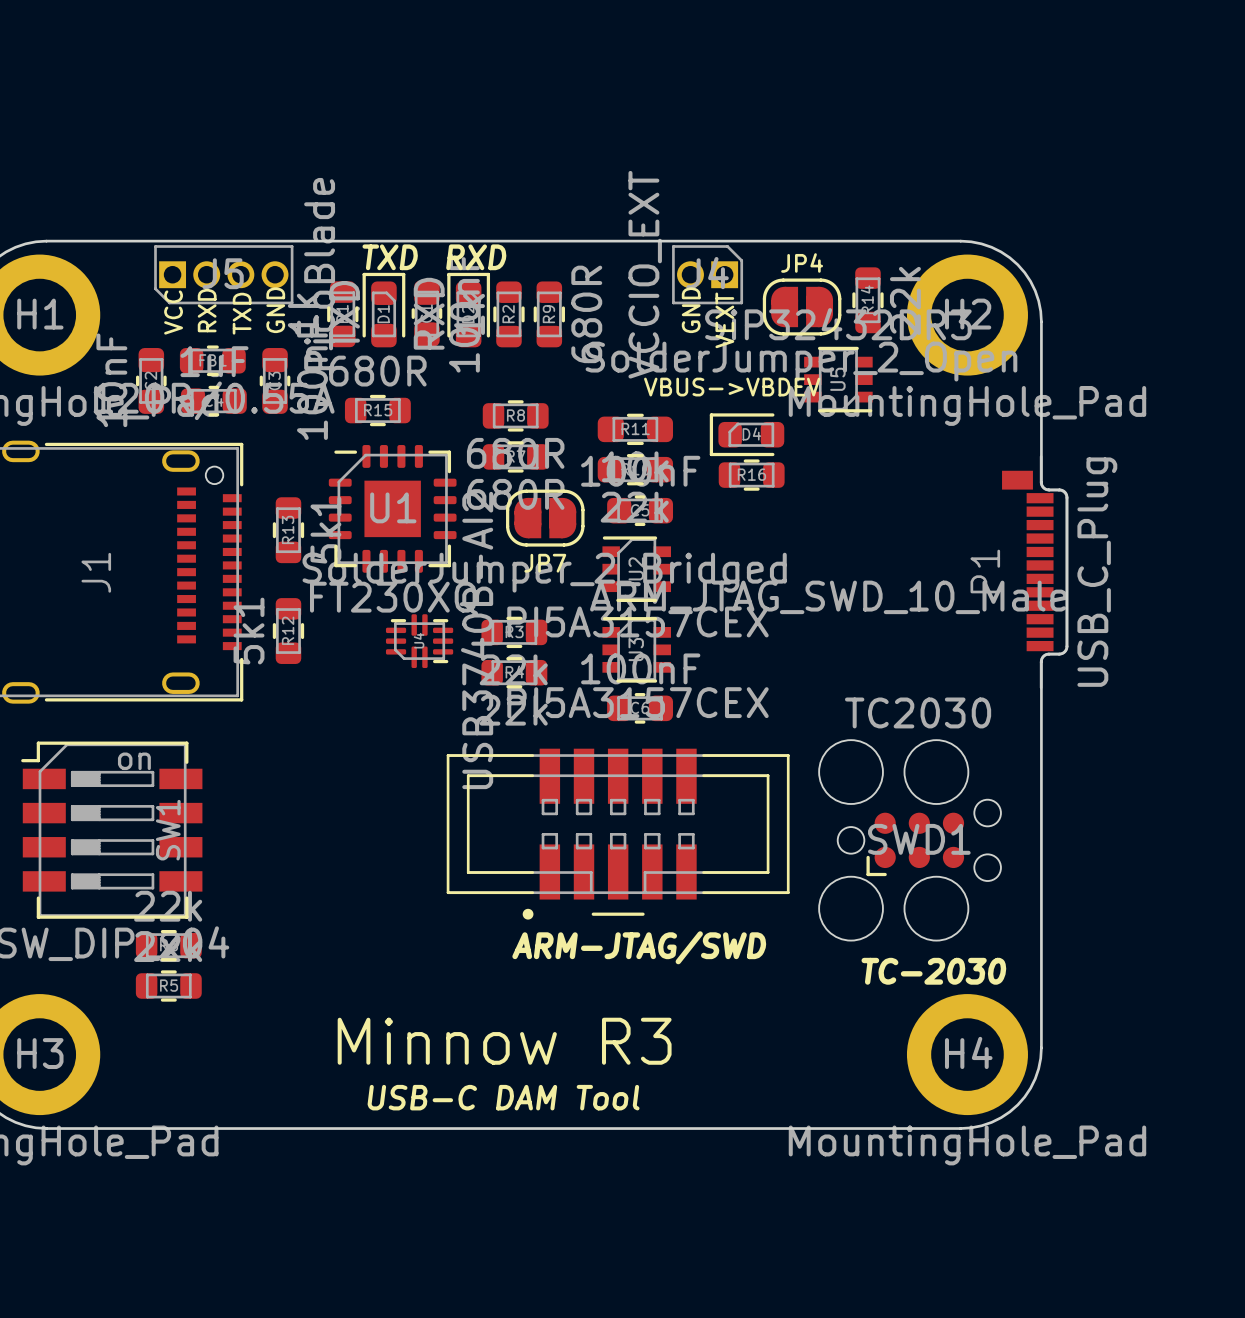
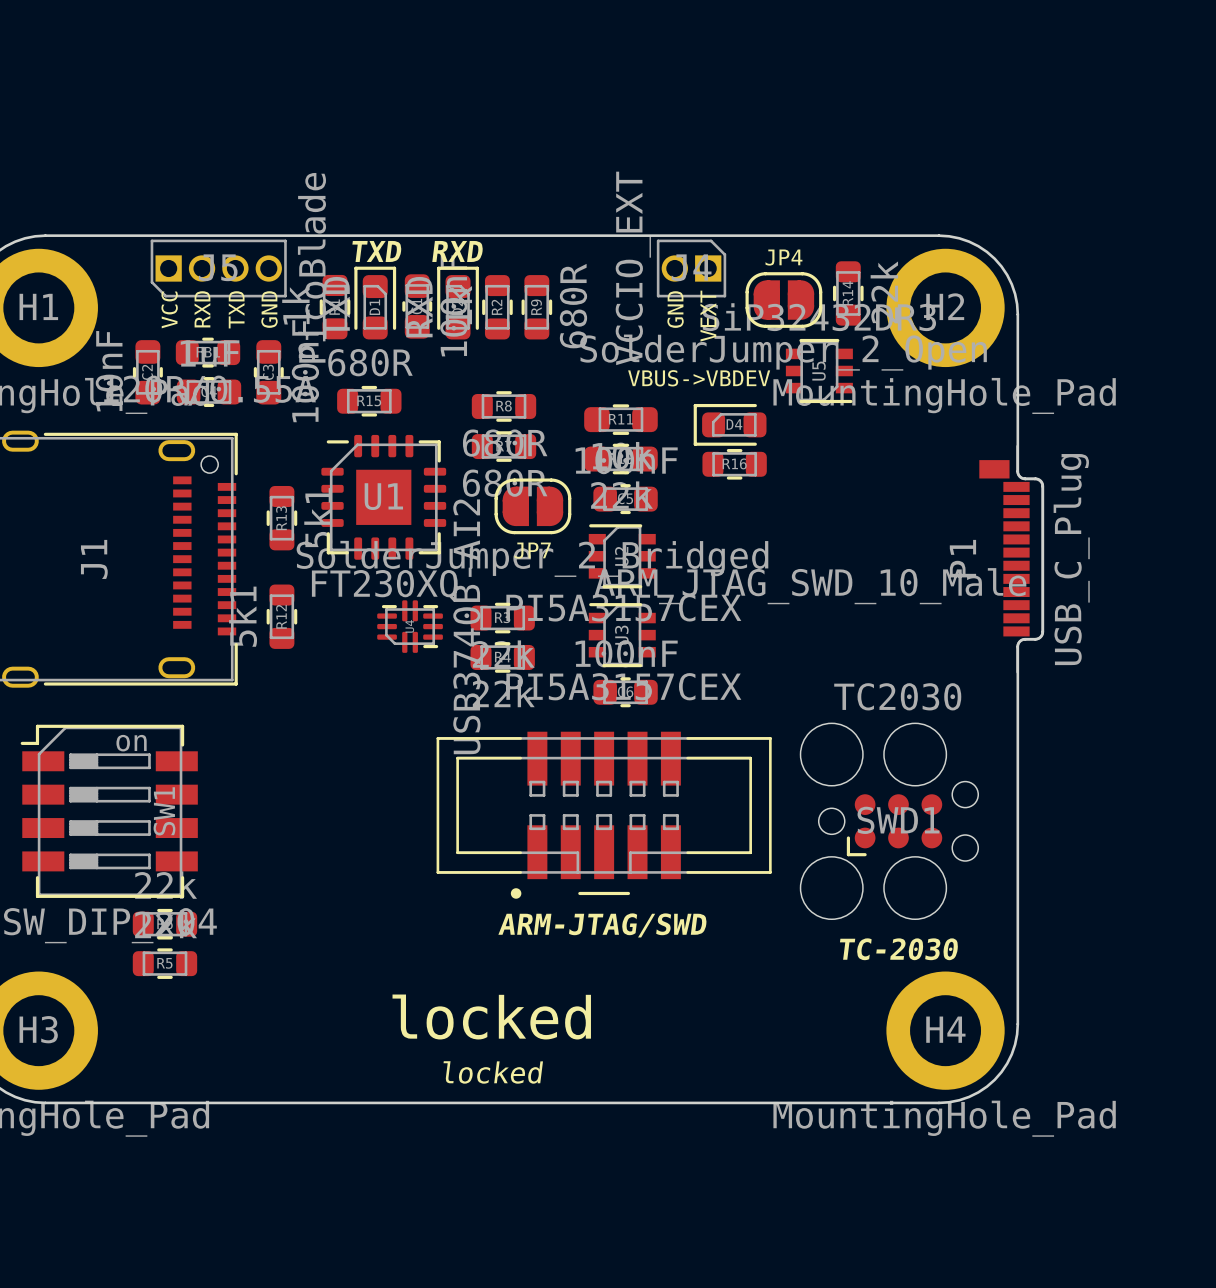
text: Minnow R3 (504, 1041) -> locked (491, 1017)
text: USB-C DAM Tool (503, 1097) -> locked (493, 1072)

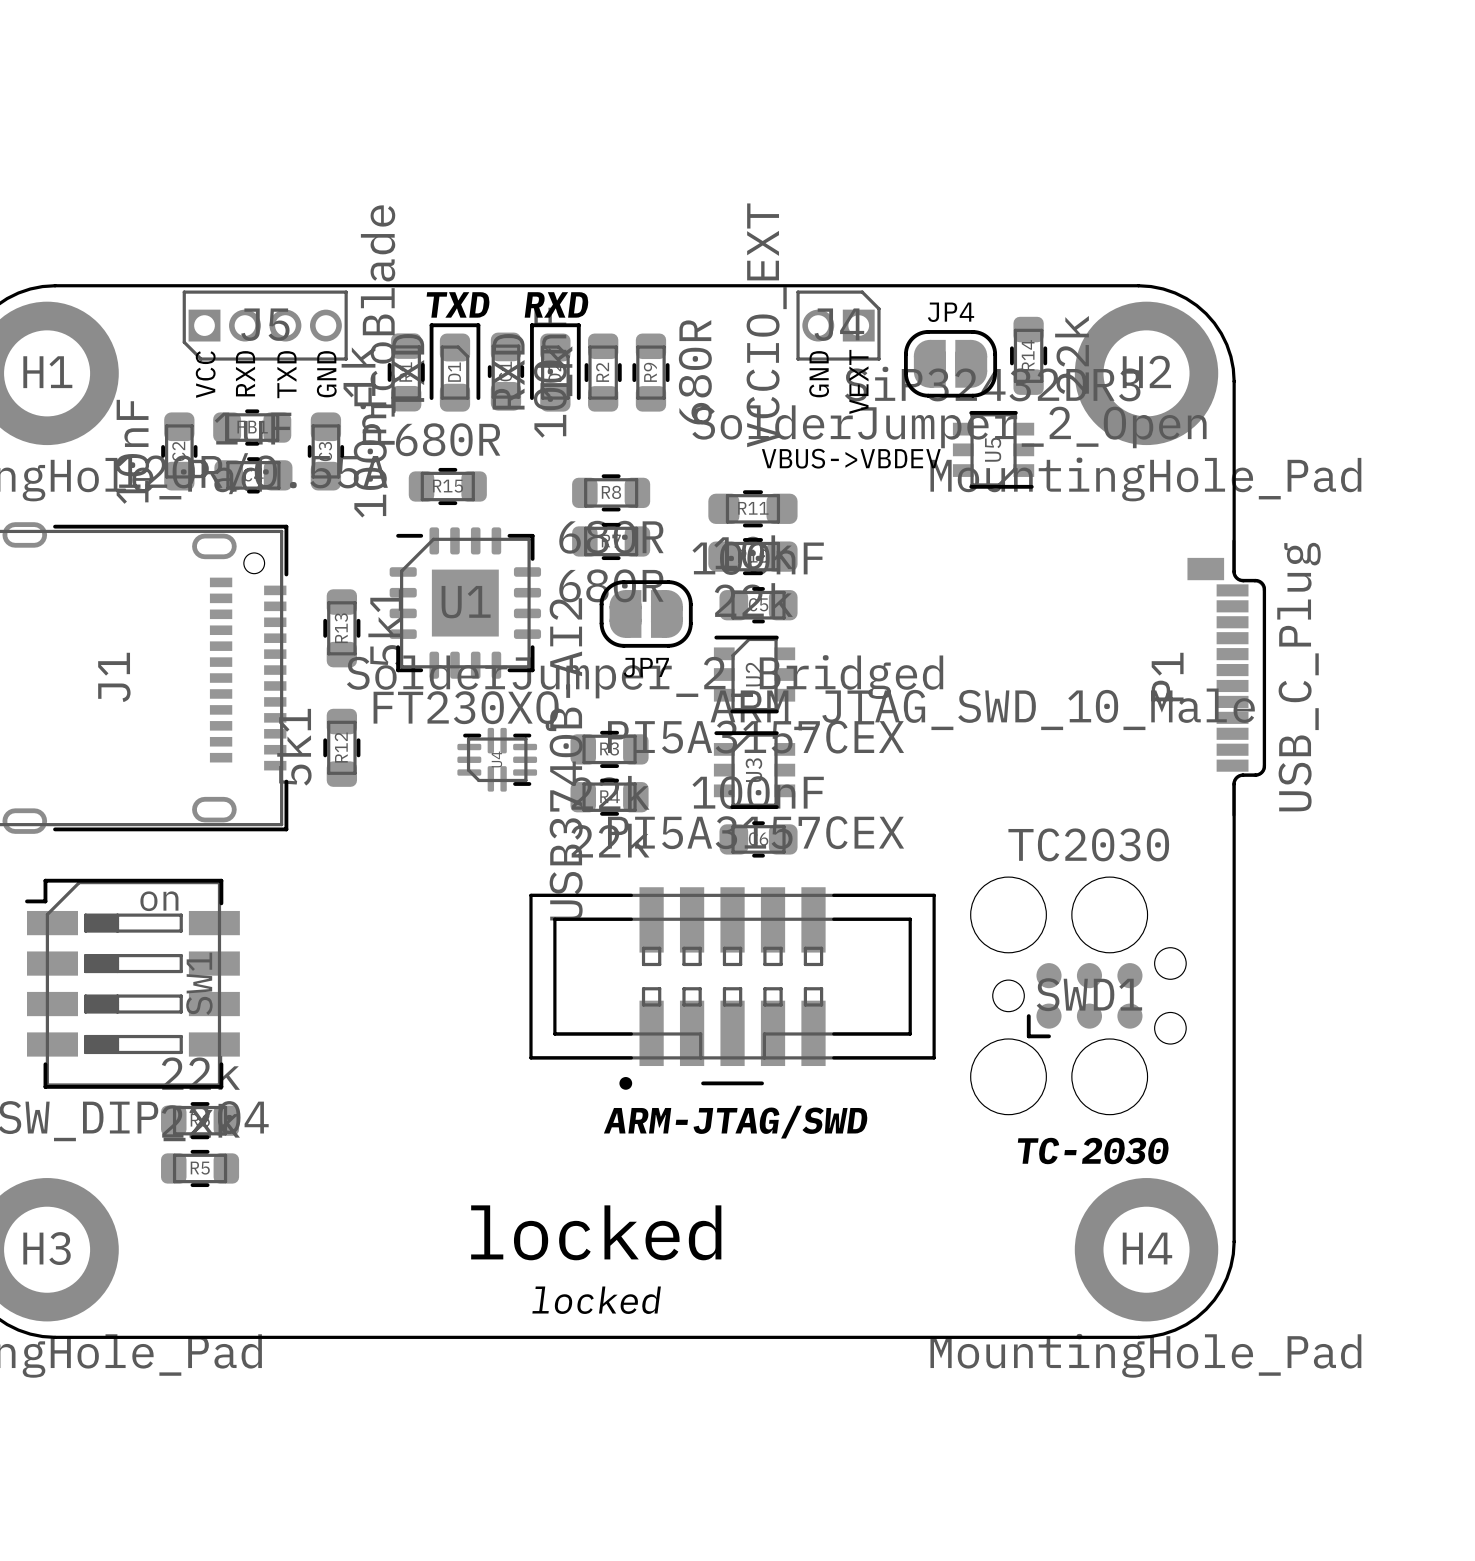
D4: (730, 424) -> none
R16: (734, 464) -> none

